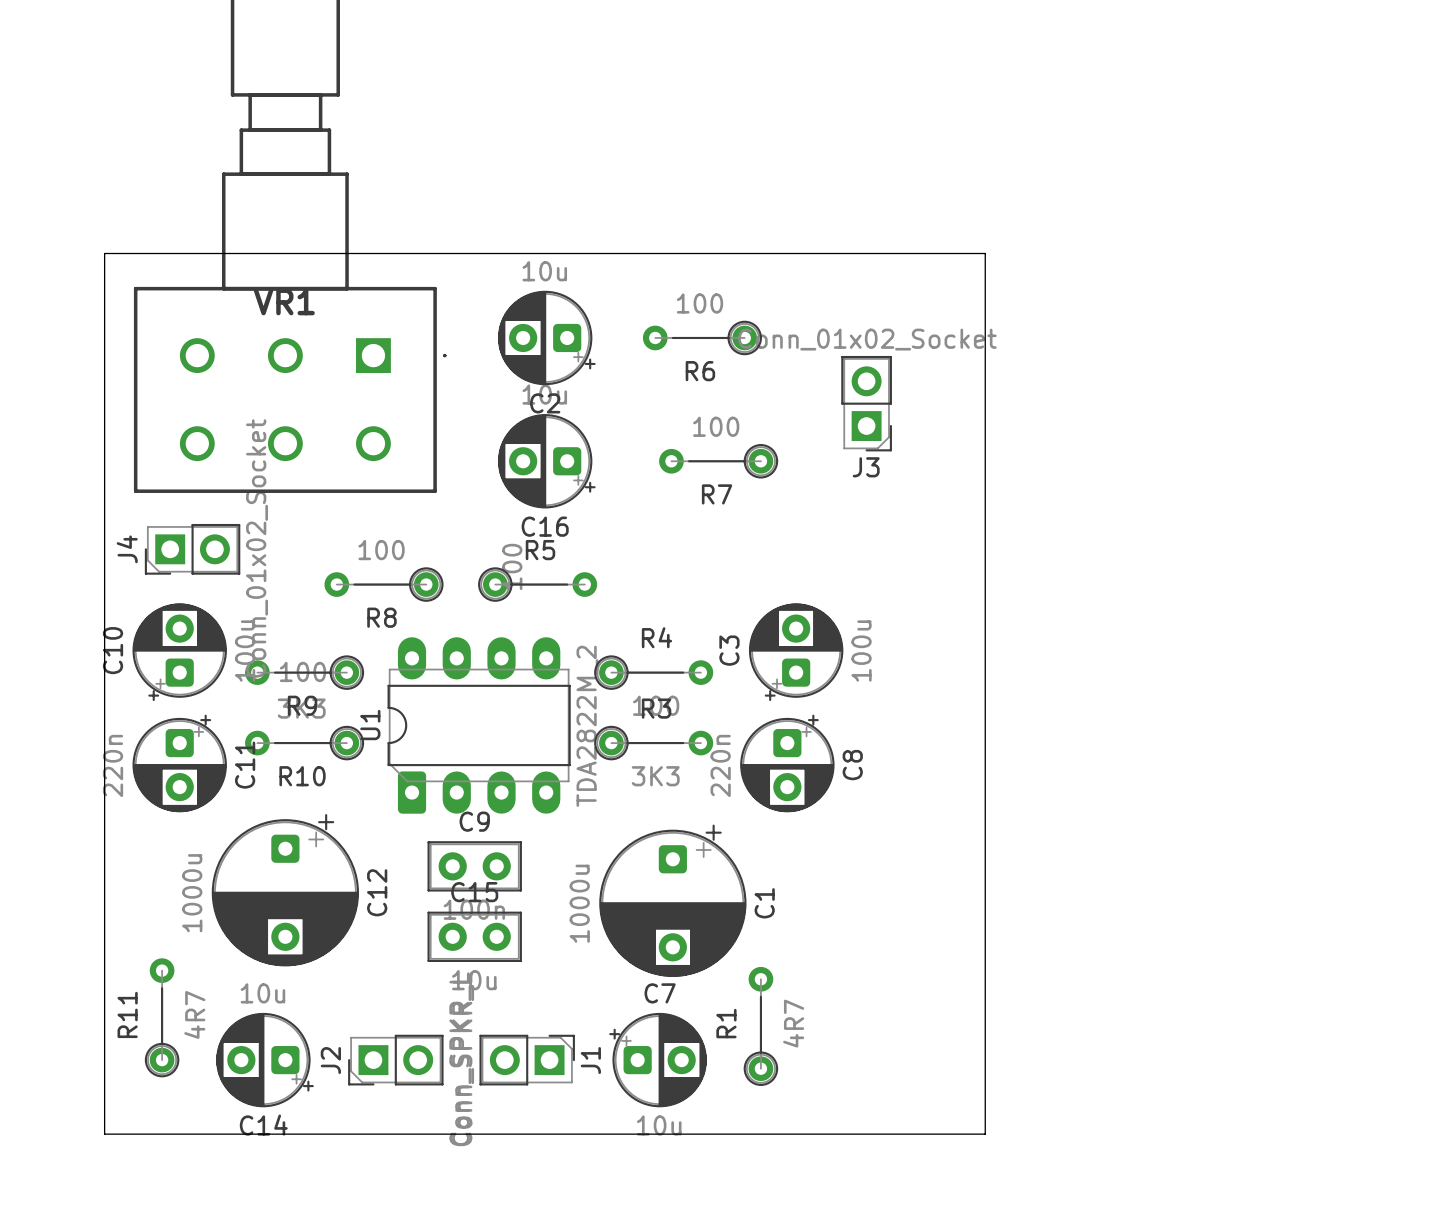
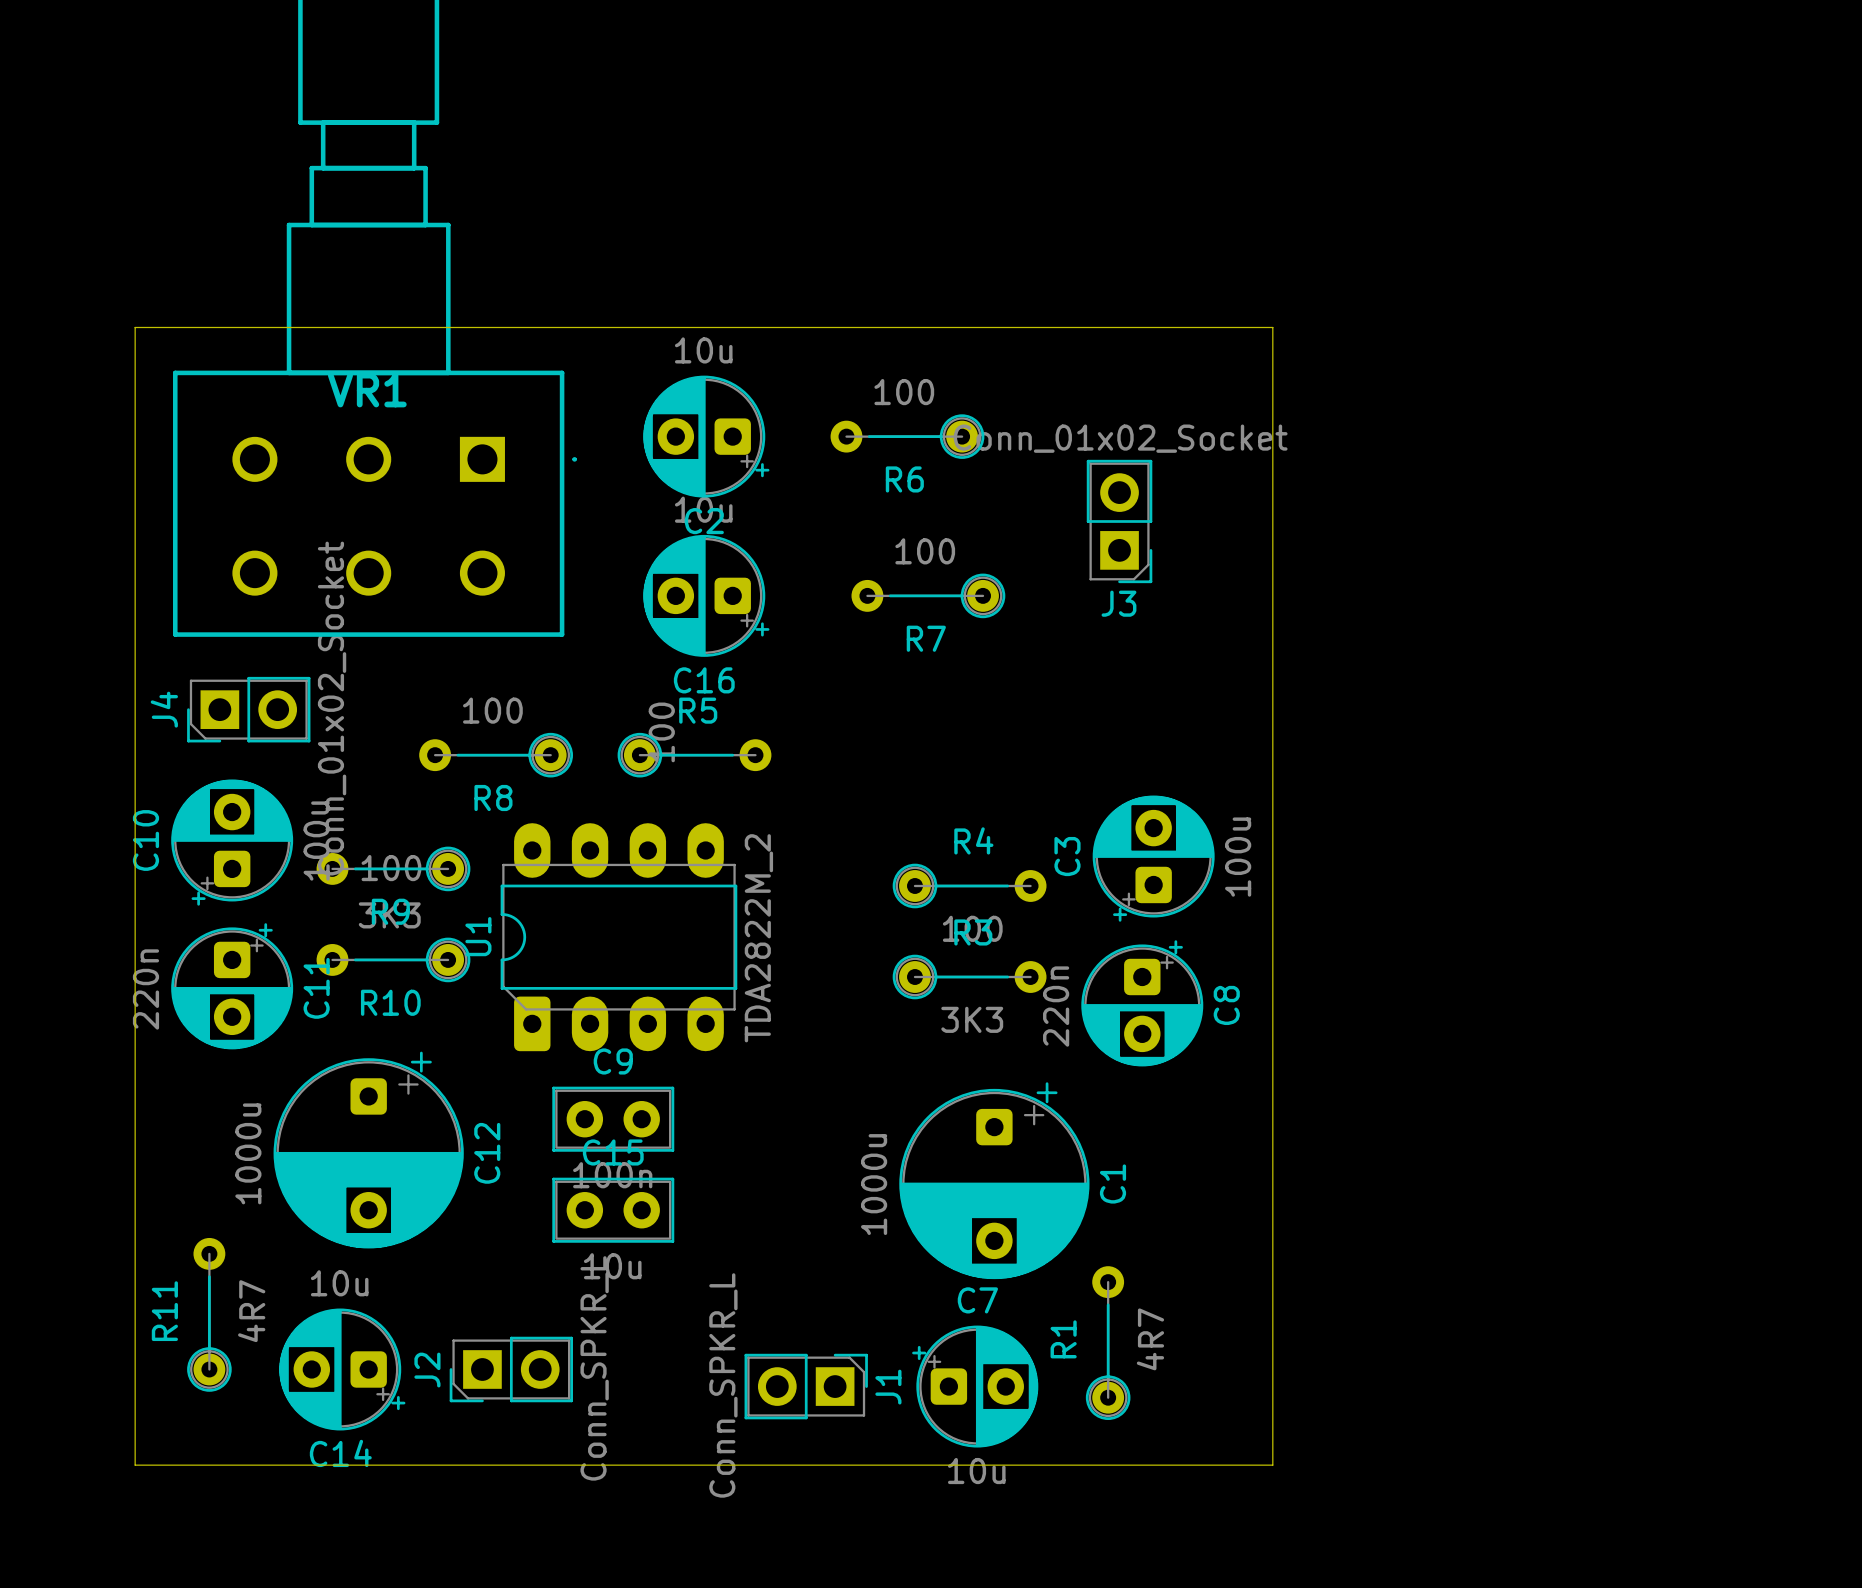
C3 position: (796, 652) -> (1153, 858)
R4 position: (653, 672) -> (969, 885)
R3 position: (653, 743) -> (969, 977)
C8 position: (787, 763) -> (1142, 1003)
C1 position: (672, 900) -> (994, 1180)
R1 position: (760, 1026) -> (1108, 1343)
J1 position: (527, 1060) -> (806, 1386)
C7 position: (658, 1060) -> (975, 1386)

